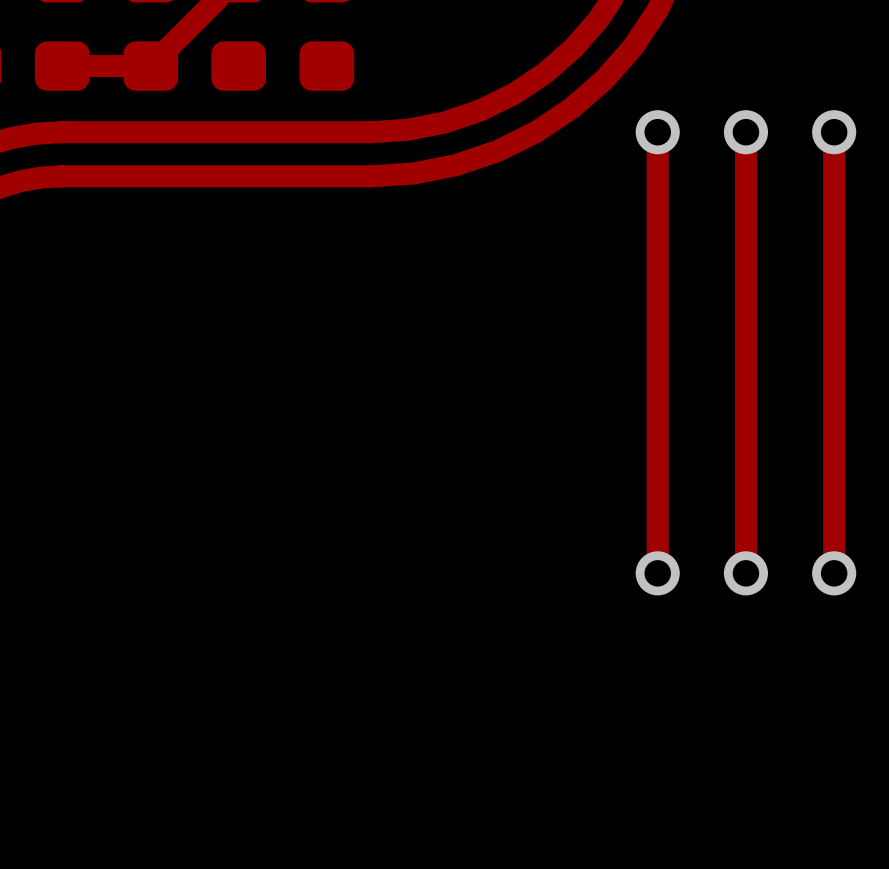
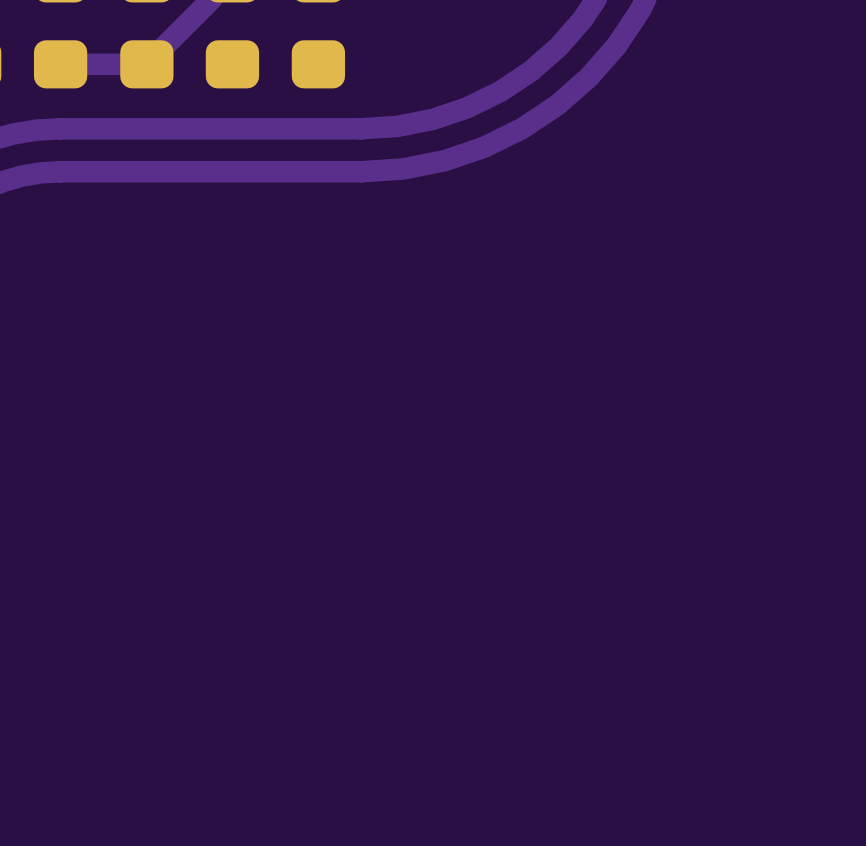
track: (657, 132) (657, 573) -> none
via: (657, 132) -> none
track: (745, 132) (745, 573) -> none
via: (745, 132) -> none
track: (834, 132) (834, 573) -> none
via: (834, 132) -> none
via: (657, 573) -> none
via: (745, 573) -> none
via: (834, 573) -> none

